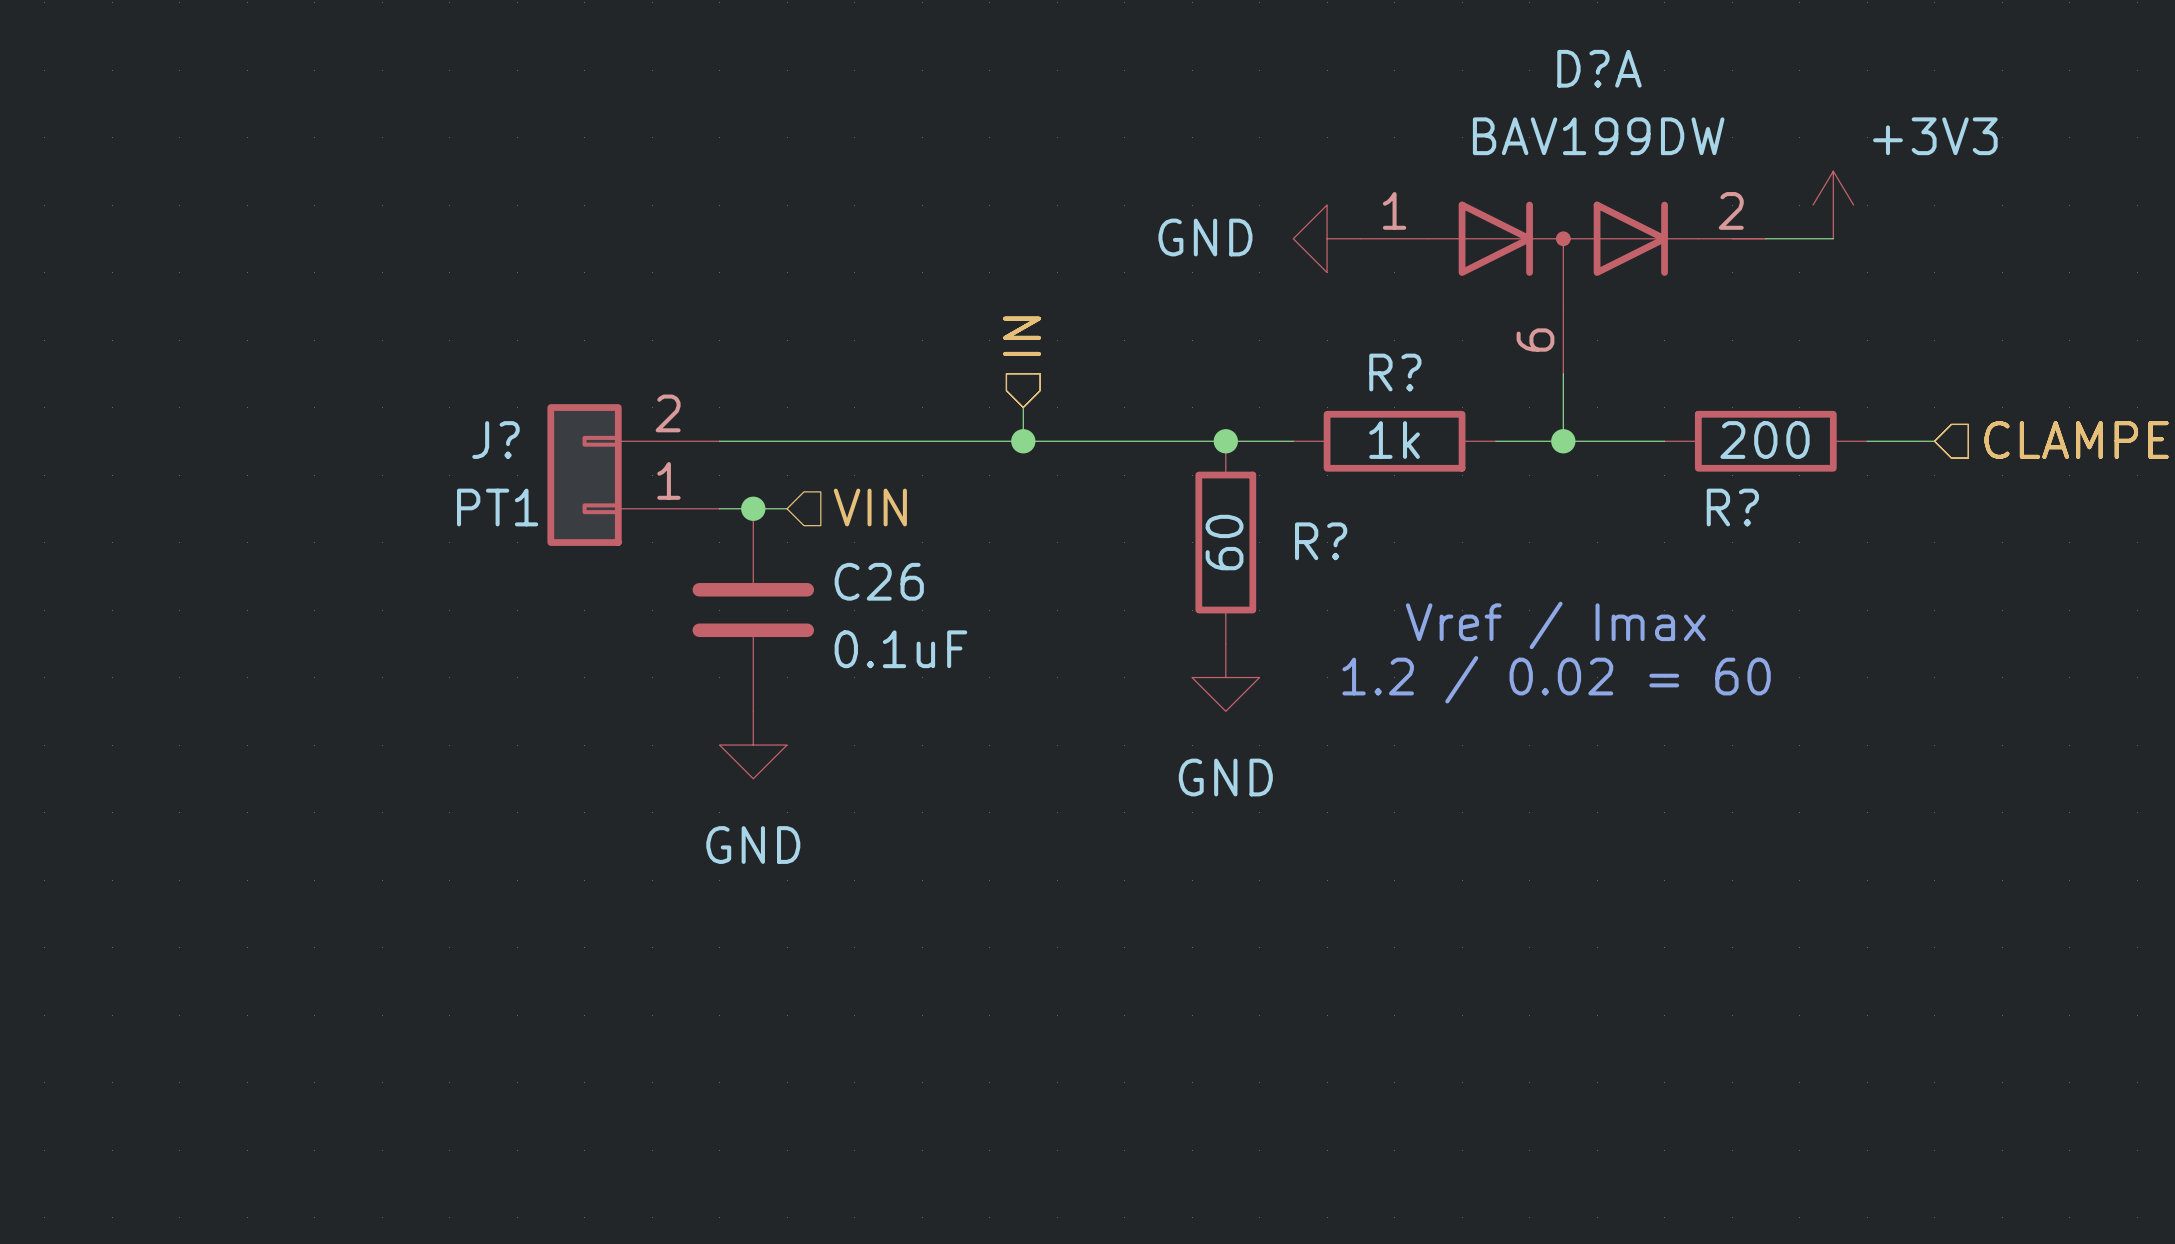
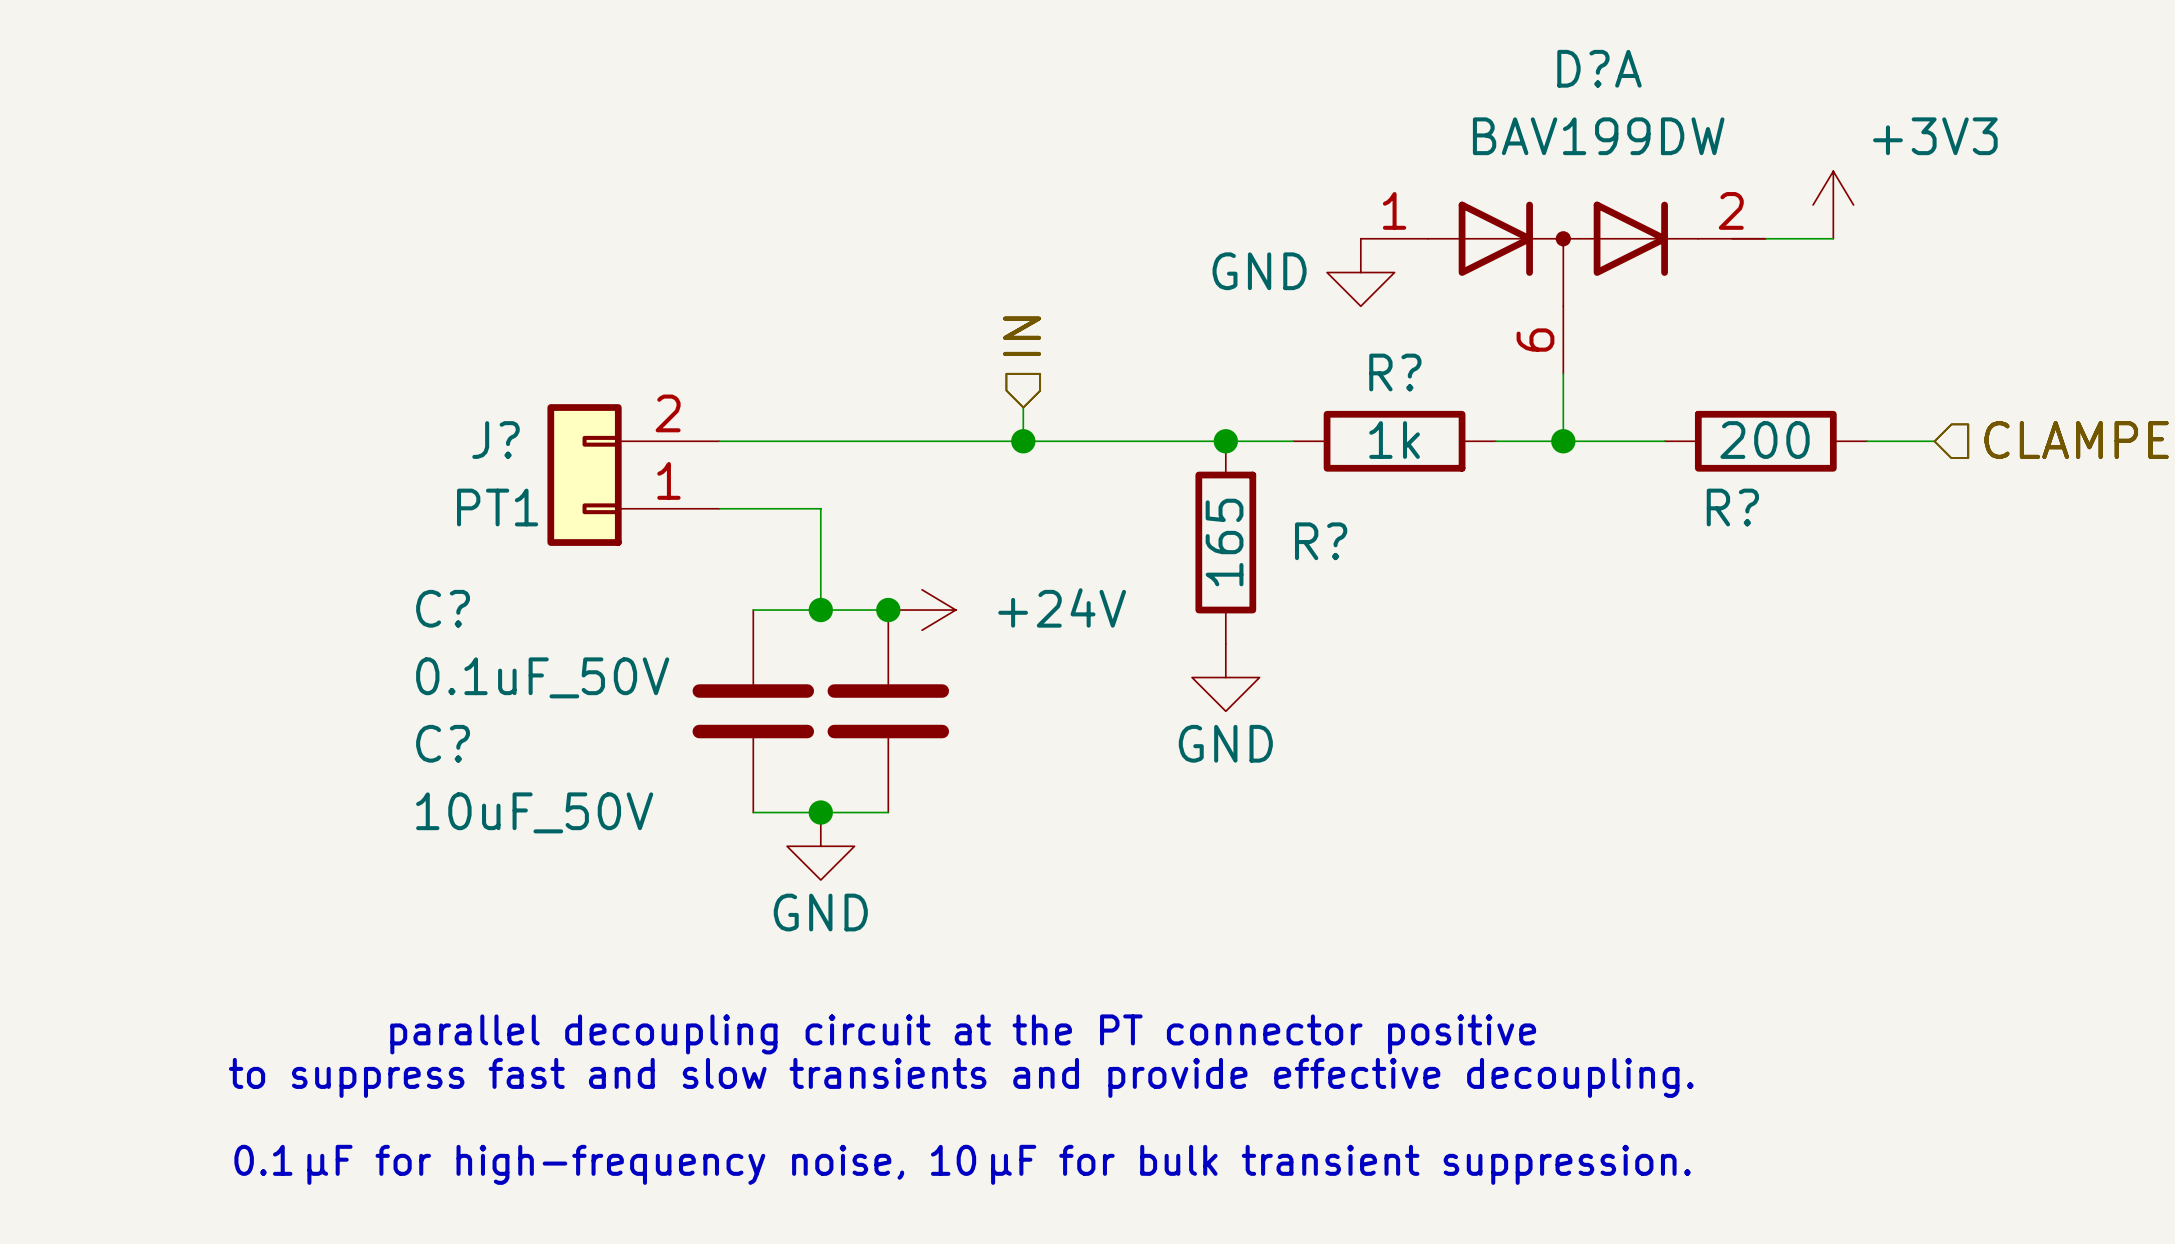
power symbol rotation: 0° (1327, 238) -> 90° counterclockwise (1360, 272)
power symbol position: GND (1327, 238) -> GND (1360, 272)
hierarchical label: VIN (870, 507) -> none
junction: (753, 508) -> none
wire: none -> (787, 508) (820, 508) (820, 610)
R? value: 60 (1224, 542) -> 165 (1224, 542)
wire: none -> (753, 610) (888, 610)
C26: 0.1uF (753, 610) -> none
junction: none -> (820, 610)
junction: none -> (888, 610)
power symbol: none -> +24V (922, 610)
text: Vref / Imax (1555, 625) -> none
text: 1.2 / 0.02 = 60 (1556, 679) -> none
C?: none -> 0.1uF_50V (753, 711)
C?: none -> 10uF_50V (888, 711)
power symbol position: GND (753, 745) -> GND (820, 846)
power symbol text position: GND (1225, 777) -> GND (1225, 743)
wire: none -> (753, 812) (888, 812)
junction: none -> (820, 812)
power symbol text position: GND (753, 845) -> GND (820, 912)
text: none -> parallel decoupling circuit at the PT connector positive (963, 1034)
text: none -> to suppress fast and slow transients and provide effective decoupling. (961, 1077)
text: none -> 0.1 µF for high-frequency noise, 10 µF for bulk transient suppression. (962, 1164)

